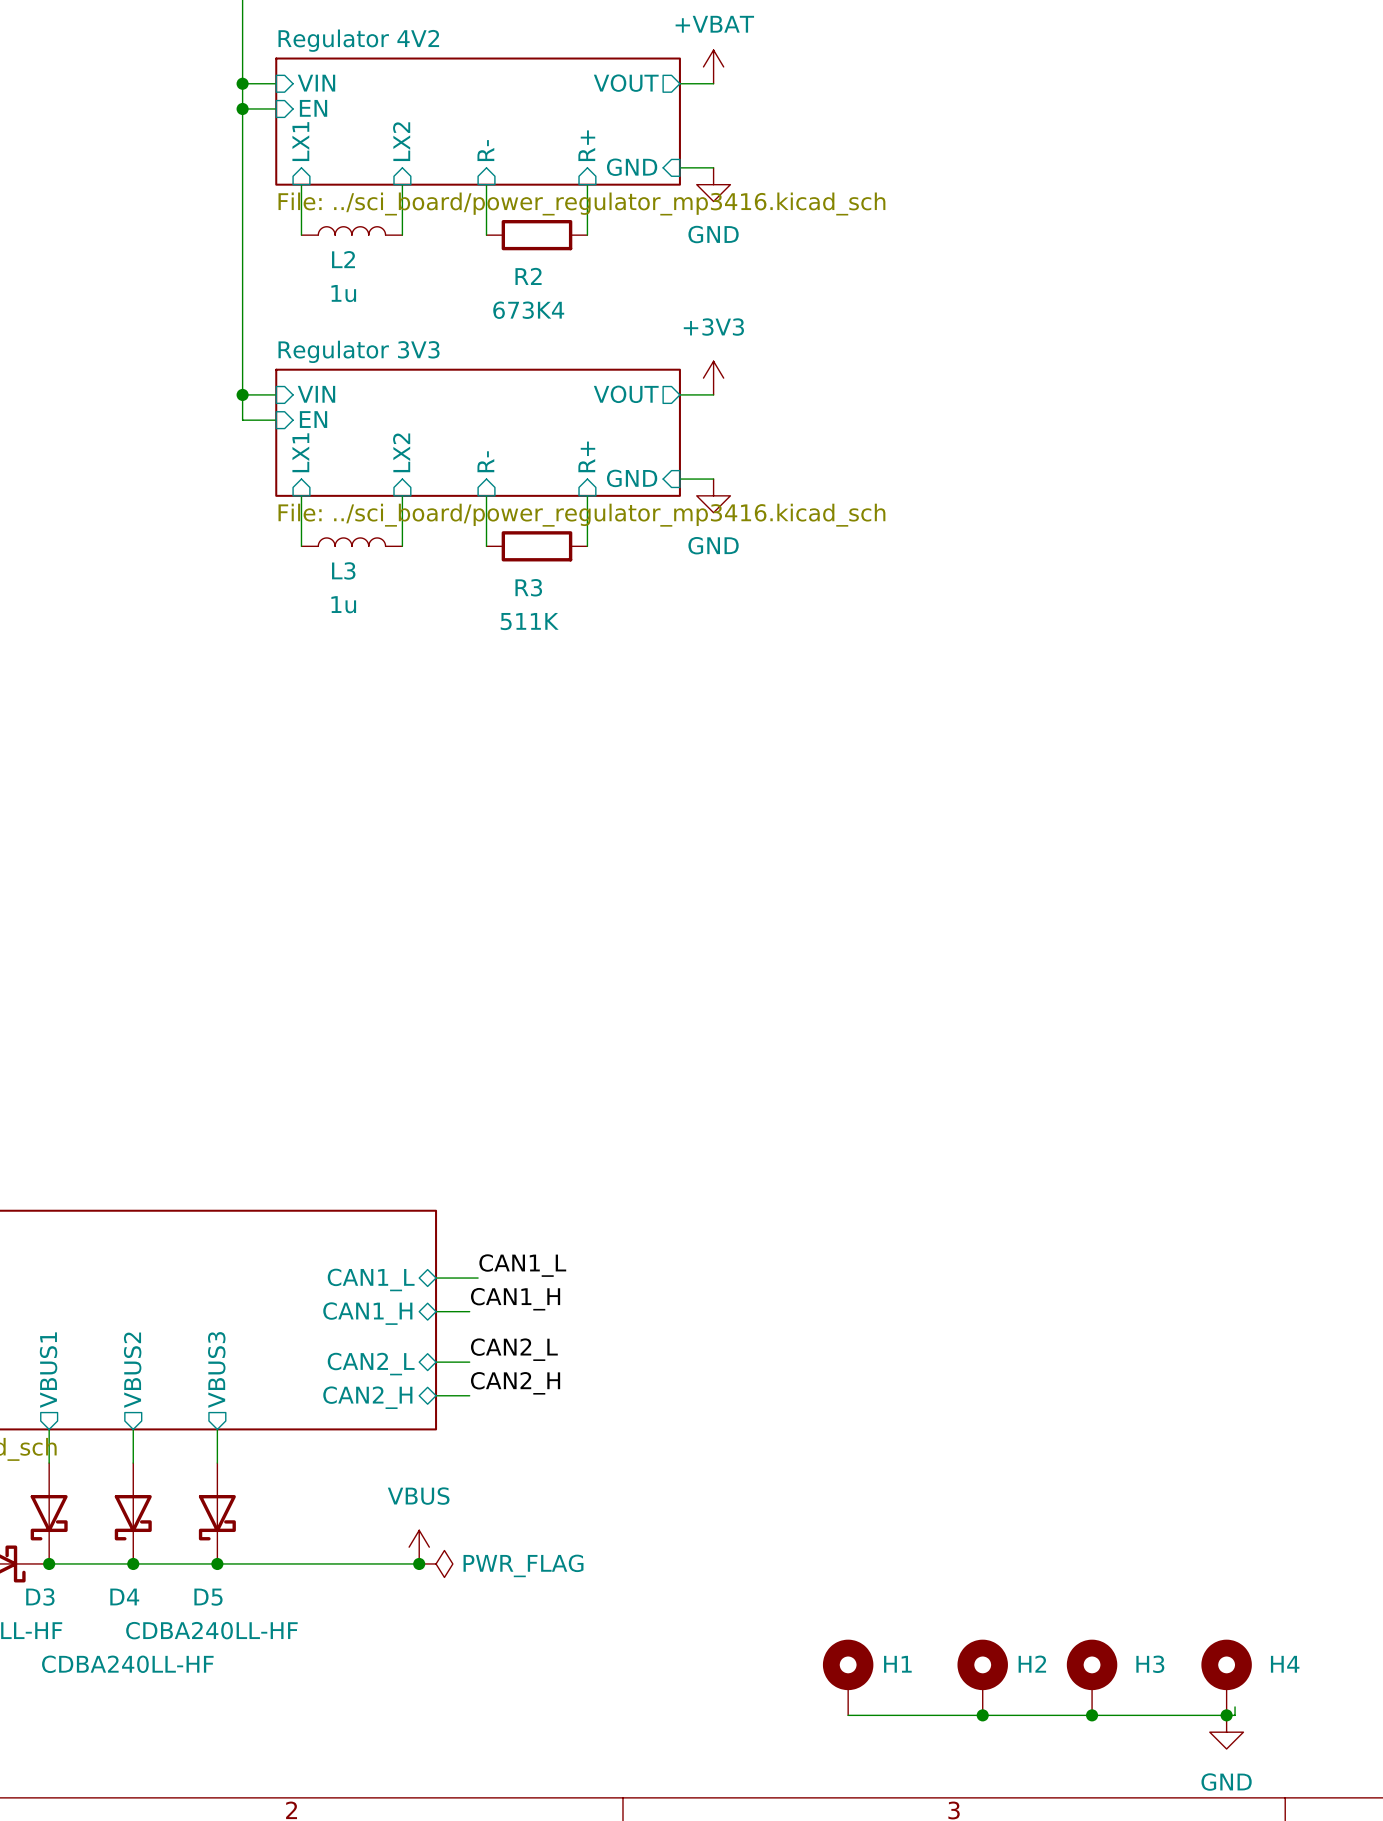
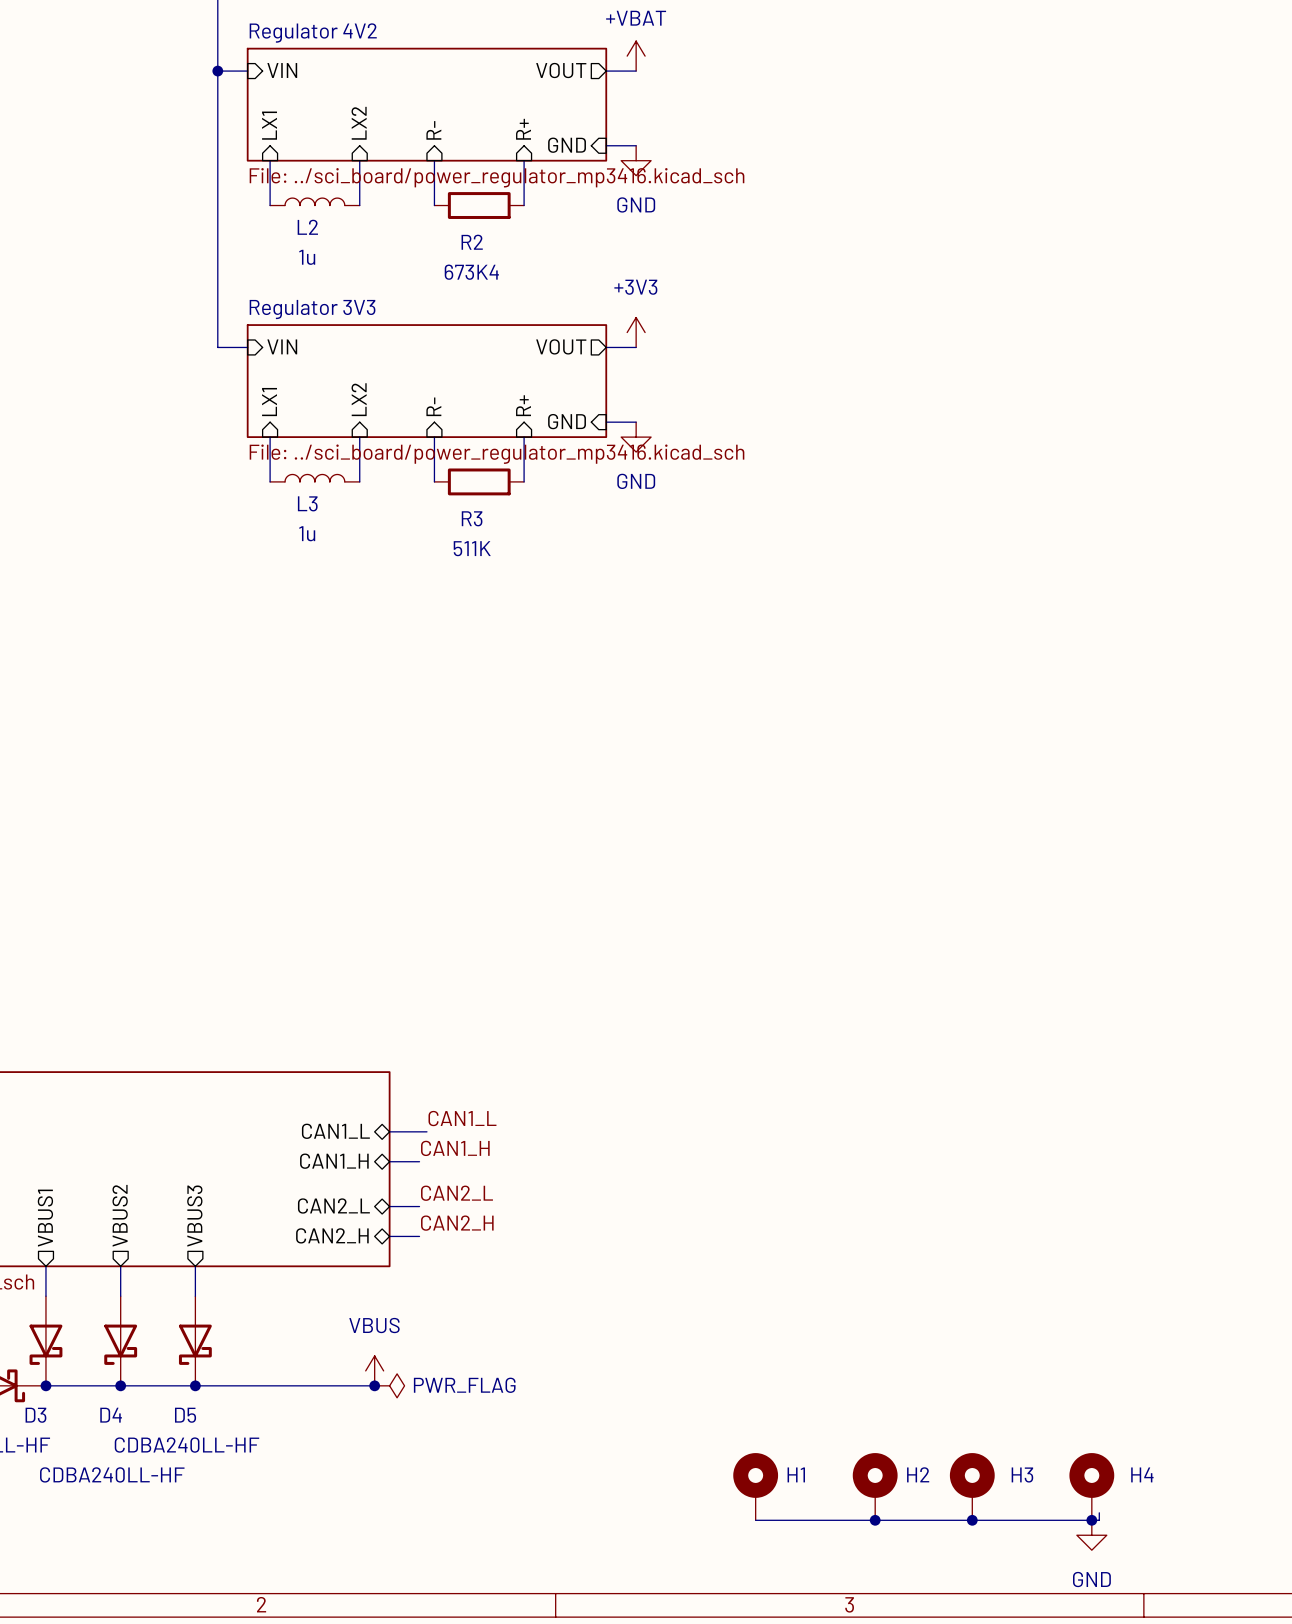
wire: (242, 108) (276, 108) -> none
junction: (242, 108) -> none
sheet pin: EN (313, 108) -> none
wire: (242, 394) (242, 420) (276, 420) -> none
junction: (242, 394) -> none
sheet pin: EN (313, 419) -> none

